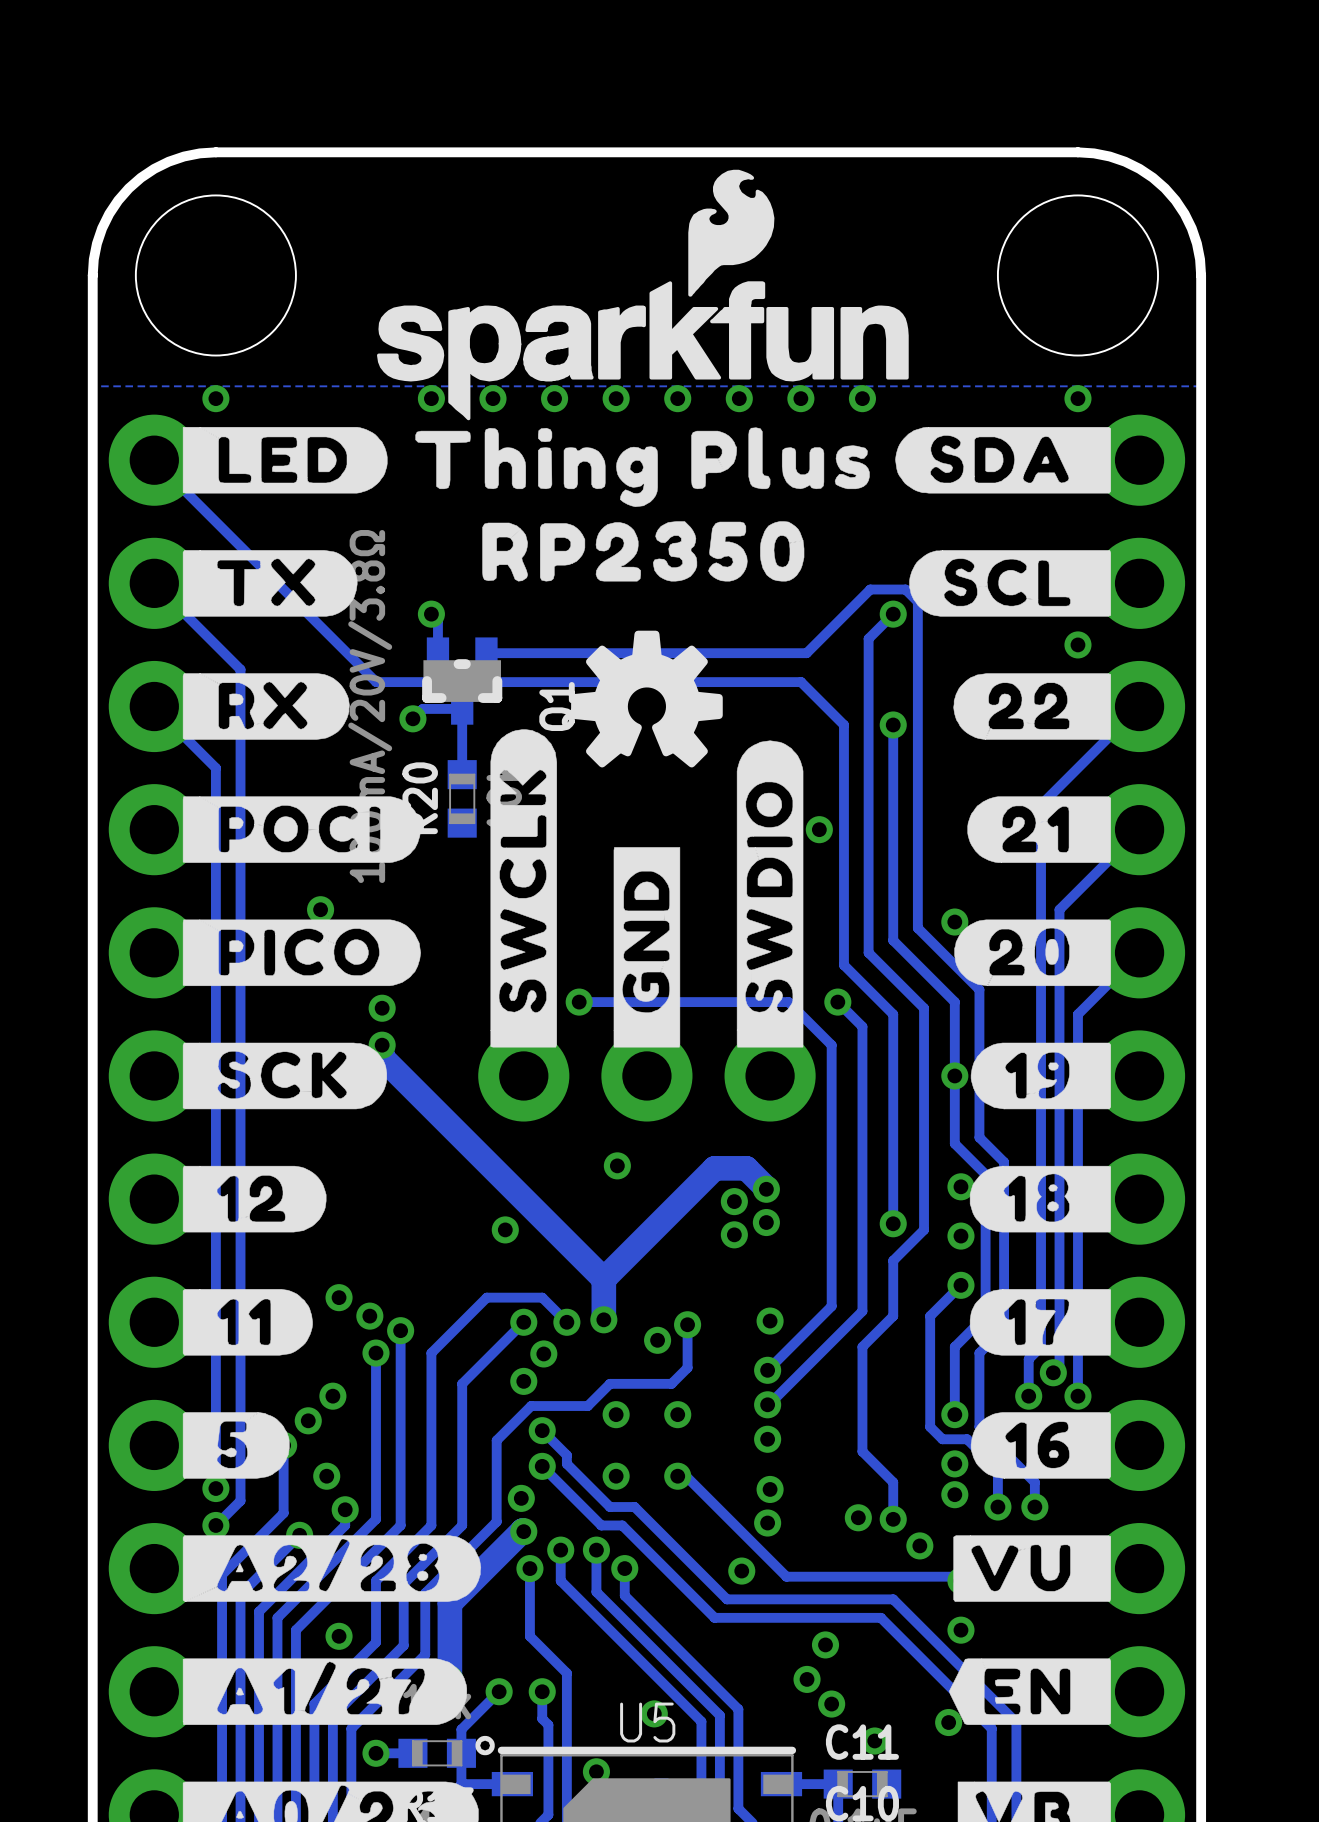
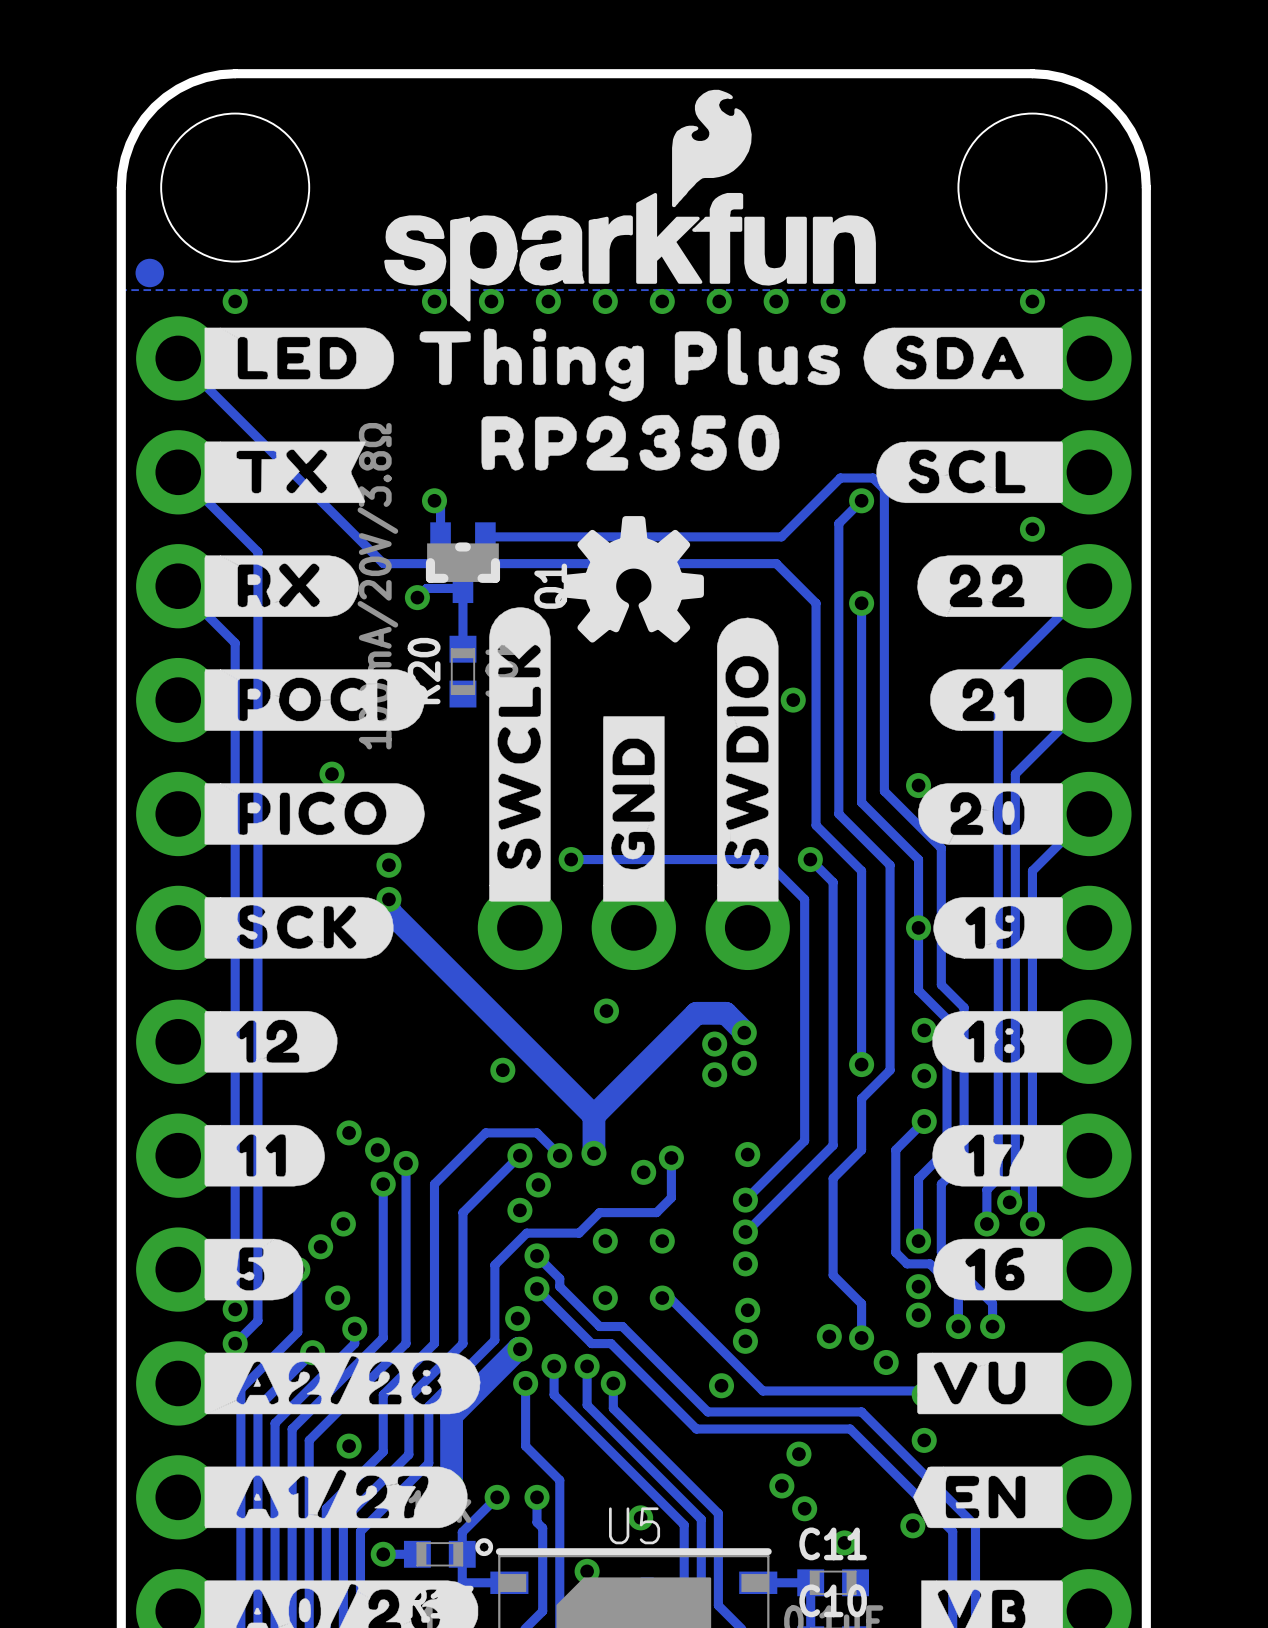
part: none -> (149, 273)
drawing shape: [182, 550, 358, 617] -> [204, 441, 366, 504]

